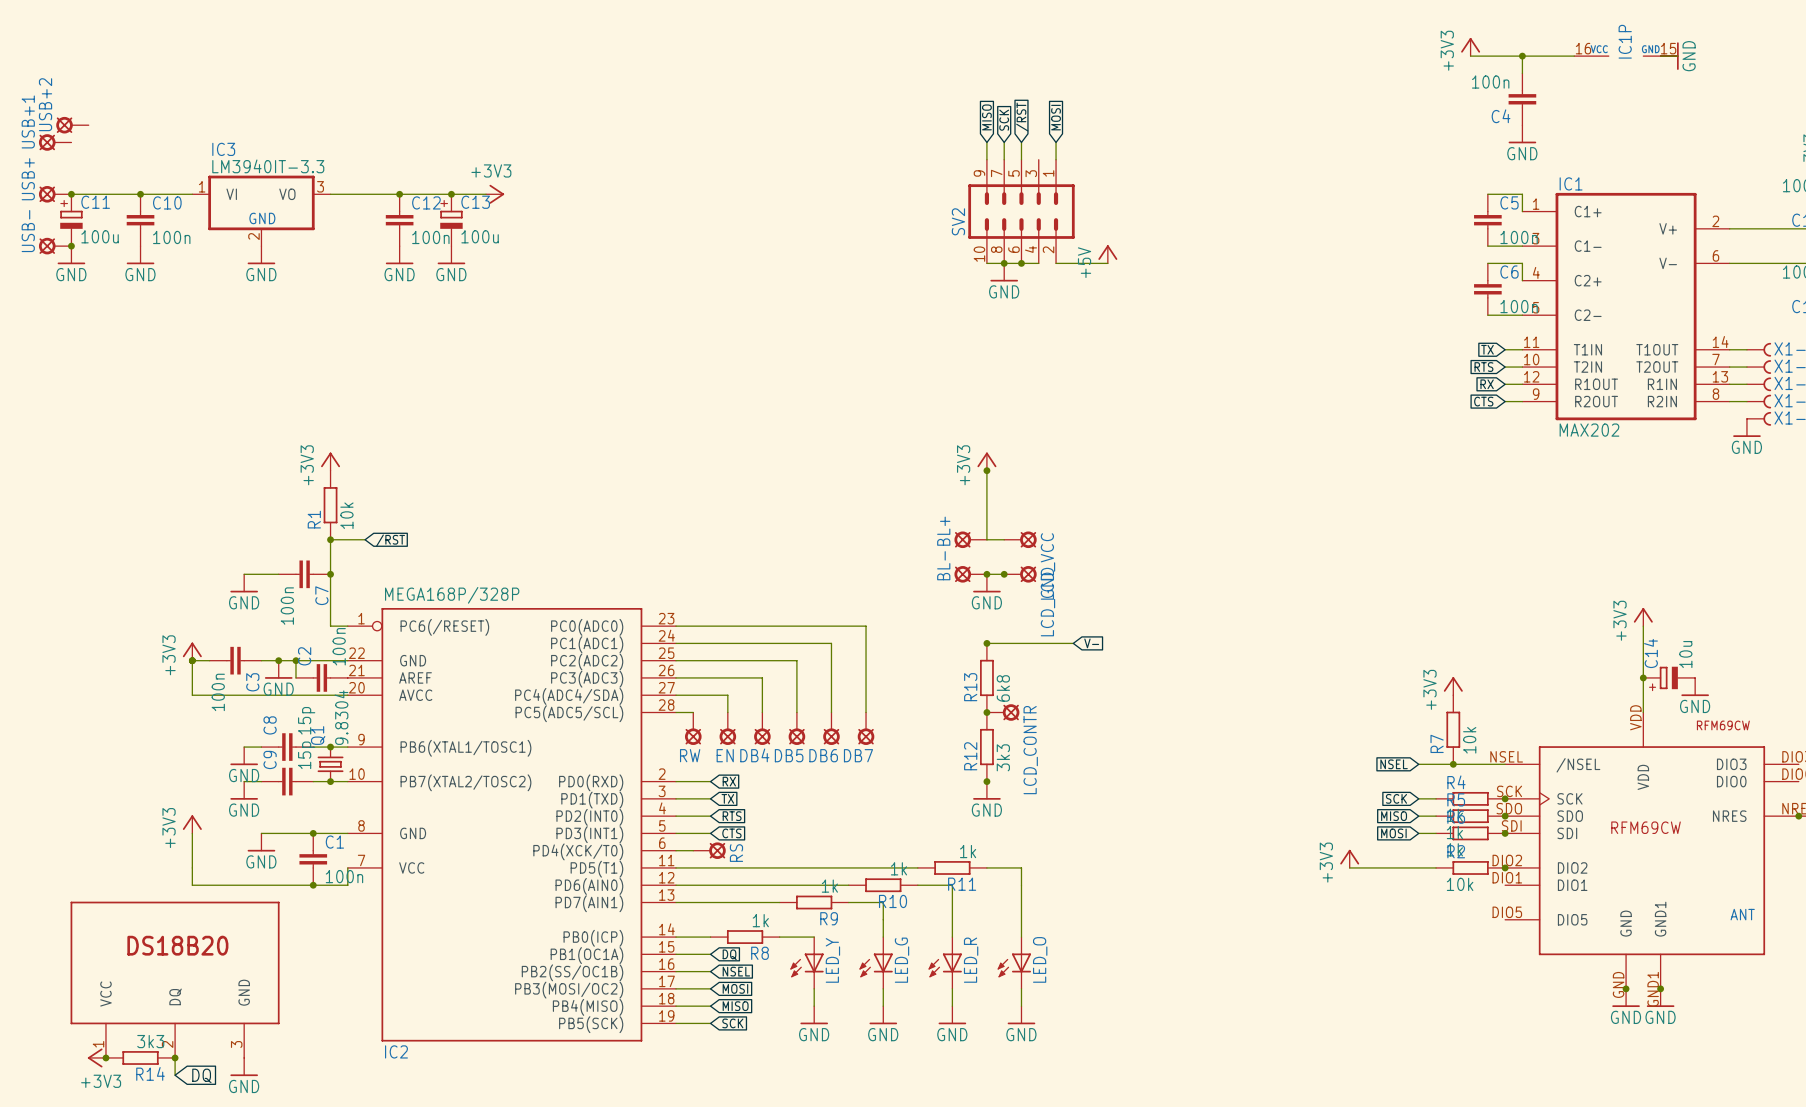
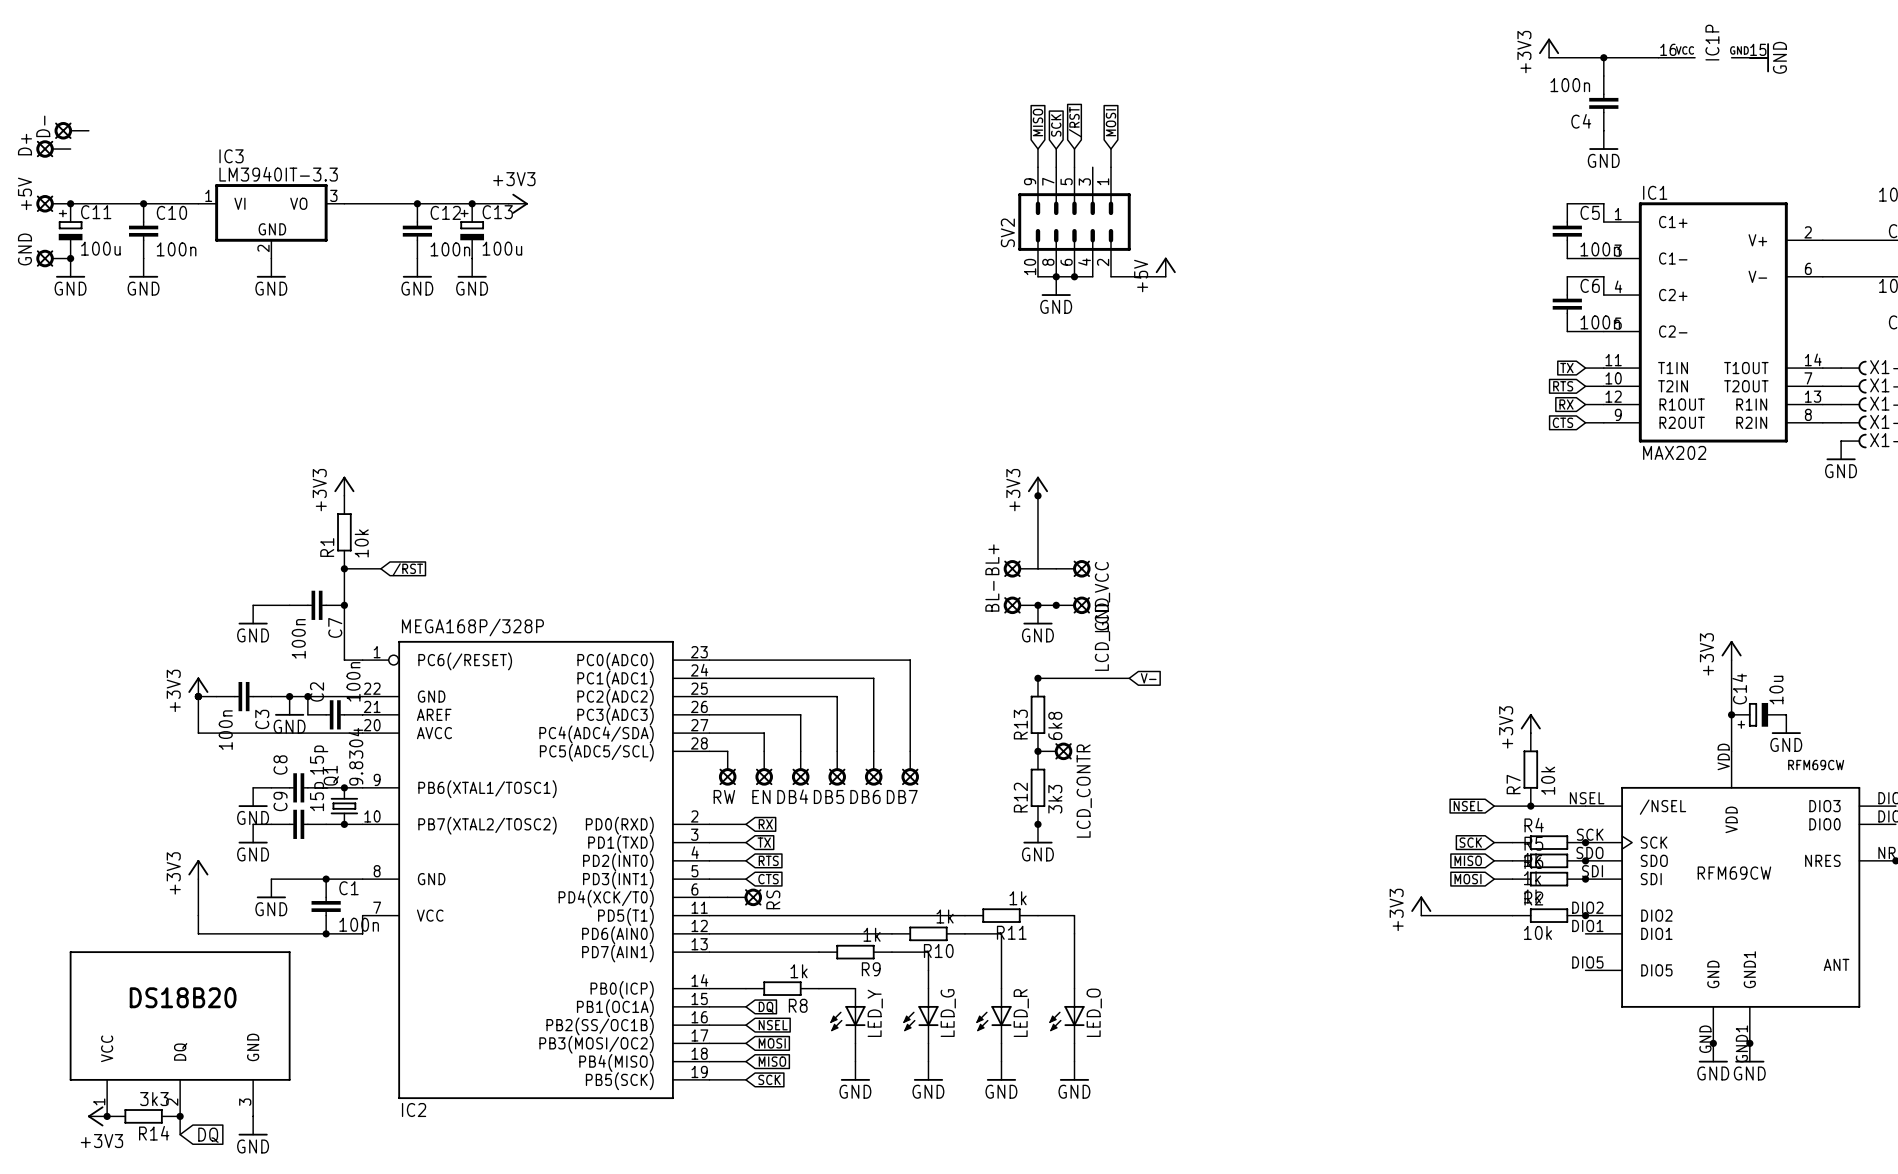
USB+2 name: USB+2 (45, 104) -> D- (43, 126)
USB+1 name: USB+1 (28, 121) -> D+ (24, 144)
USB+ name: USB+ (28, 179) -> +5V (24, 193)
USB- name: USB- (28, 231) -> GND (24, 249)

